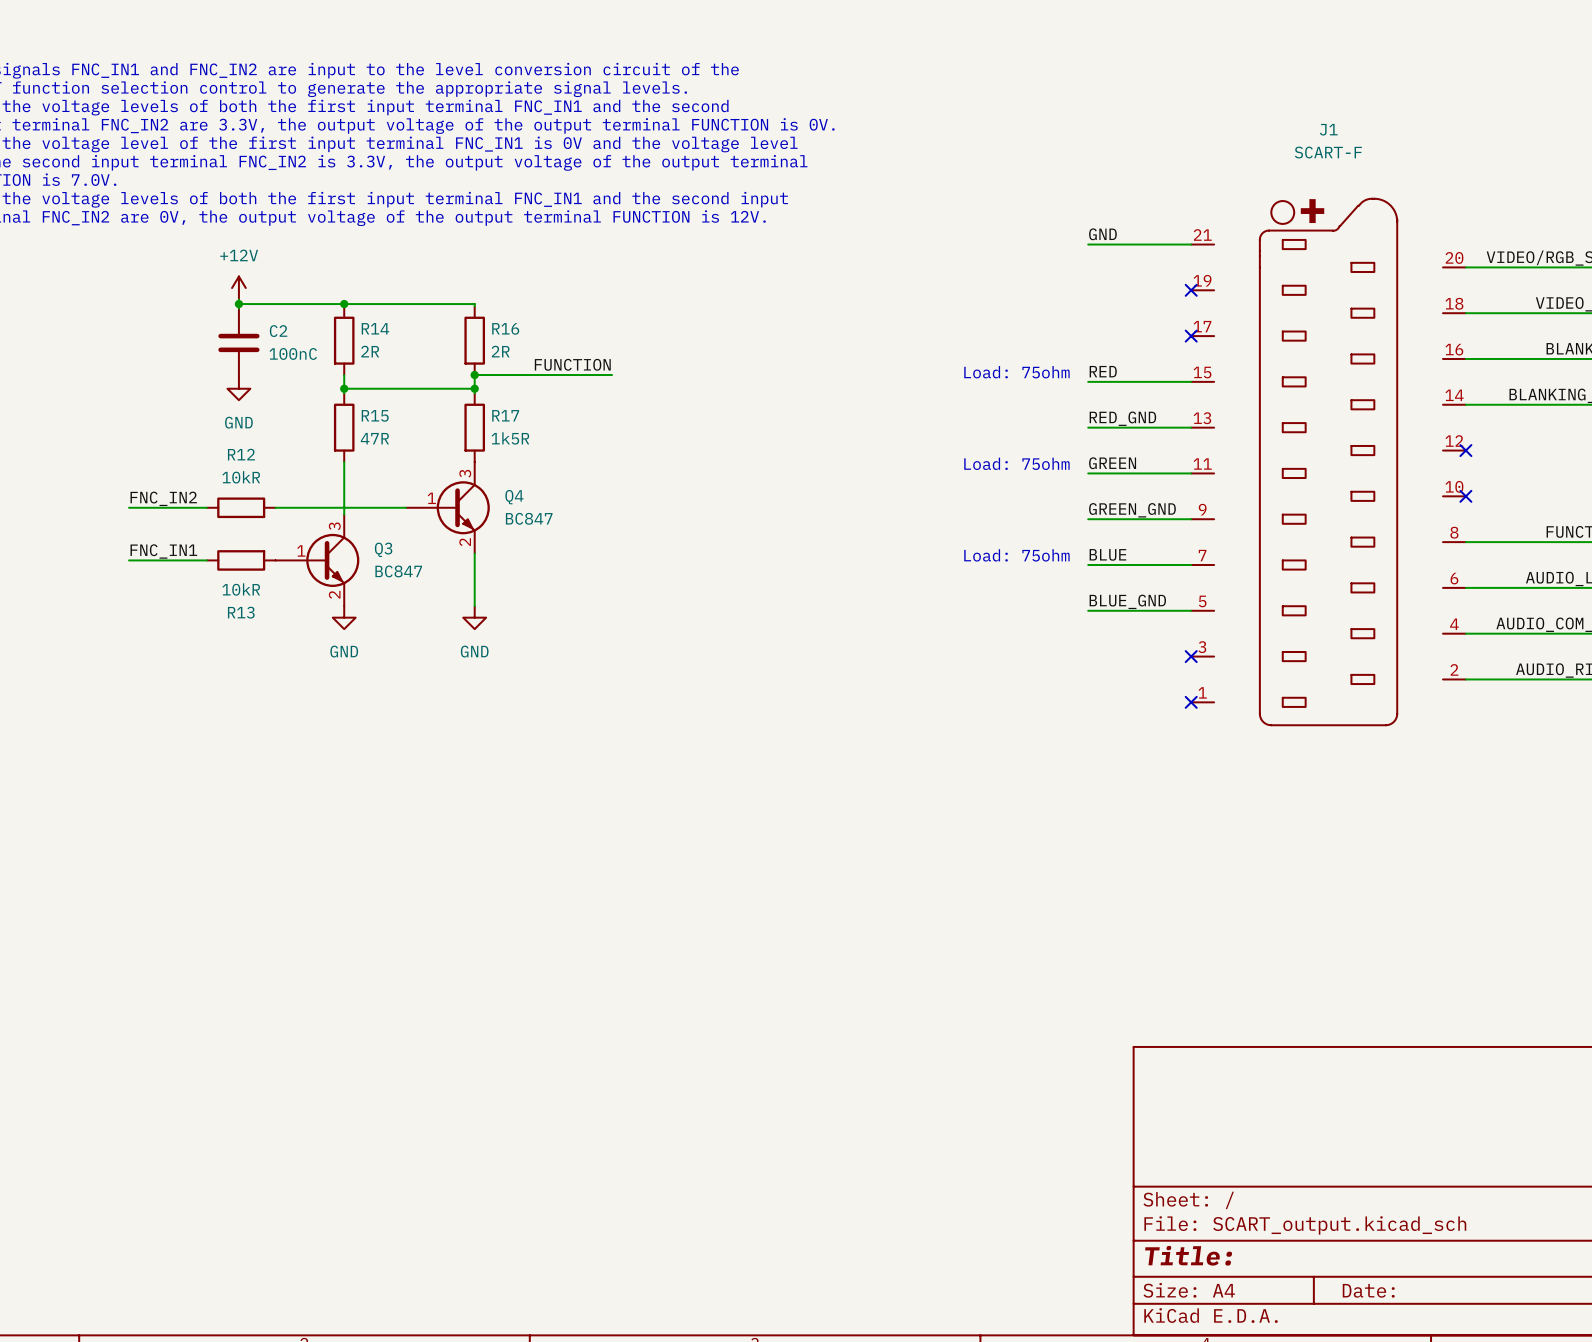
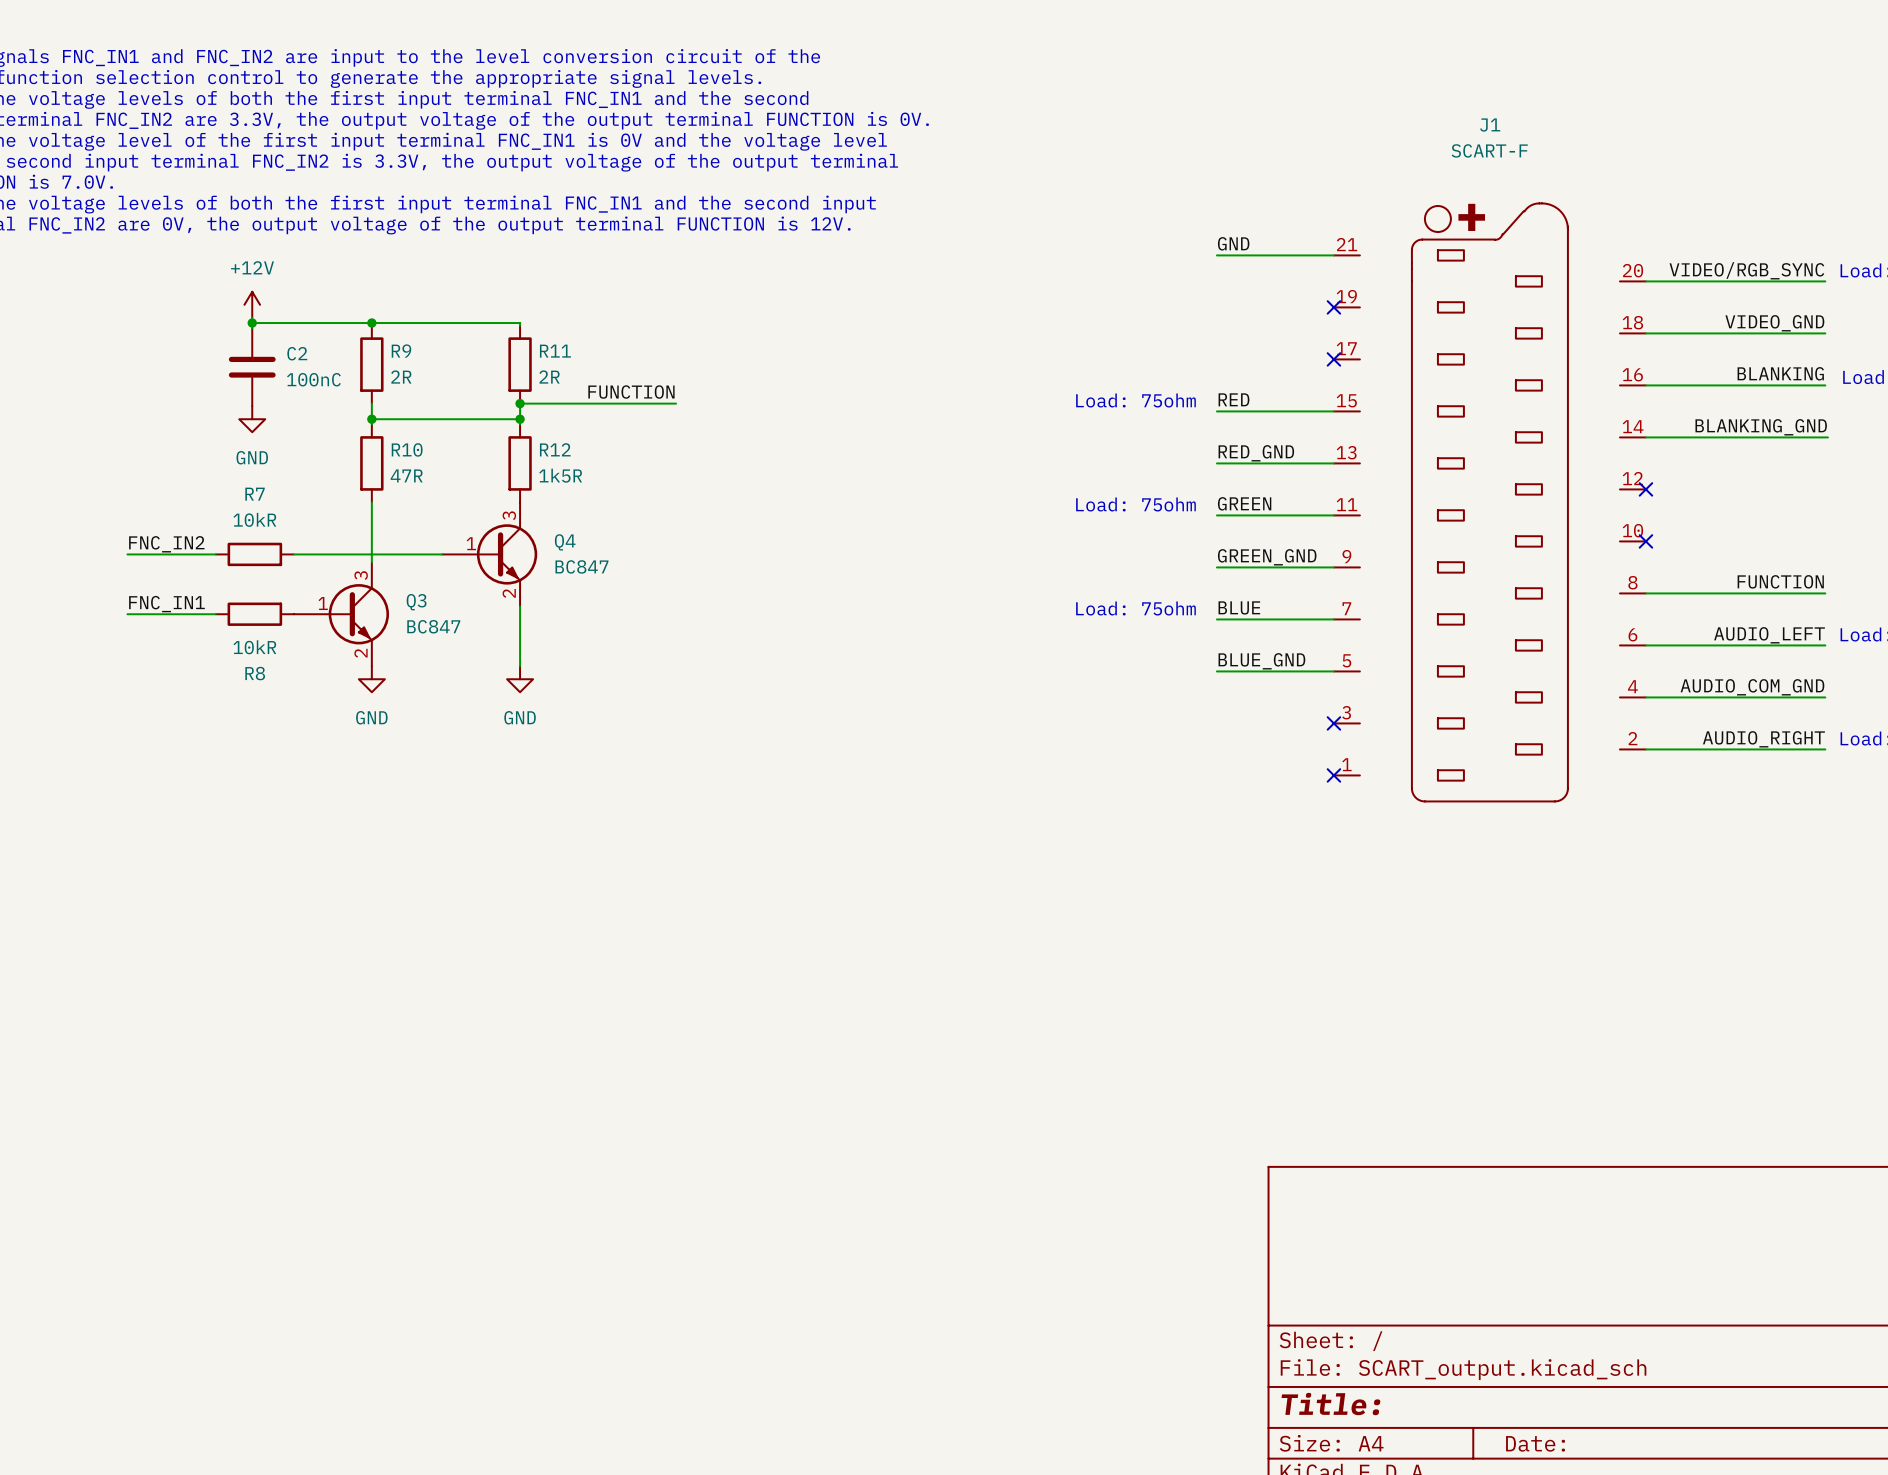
R14 name: R14 (375, 328) -> R9 (401, 351)
R16 name: R16 (505, 328) -> R11 (555, 351)
R15 name: R15 (375, 415) -> R10 (407, 449)
R17 name: R17 (505, 415) -> R12 (555, 449)
R12 name: R12 (241, 454) -> R7 (255, 494)
R13 name: R13 (241, 612) -> R8 (255, 673)

